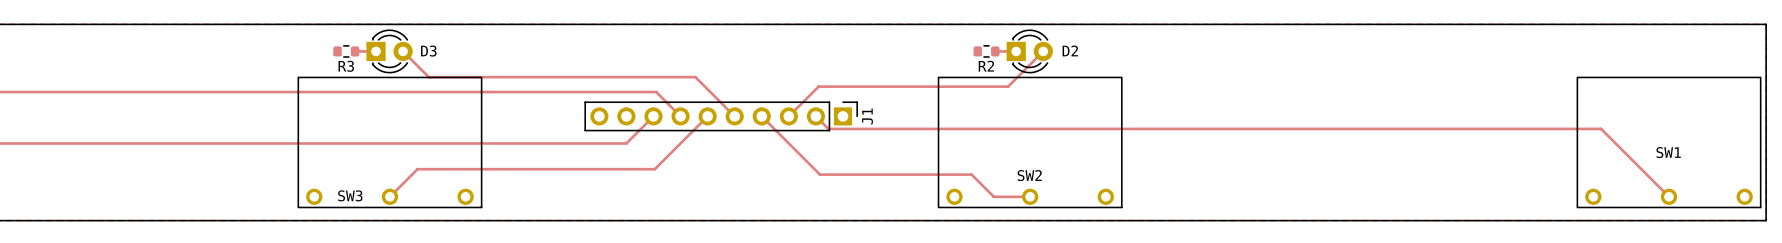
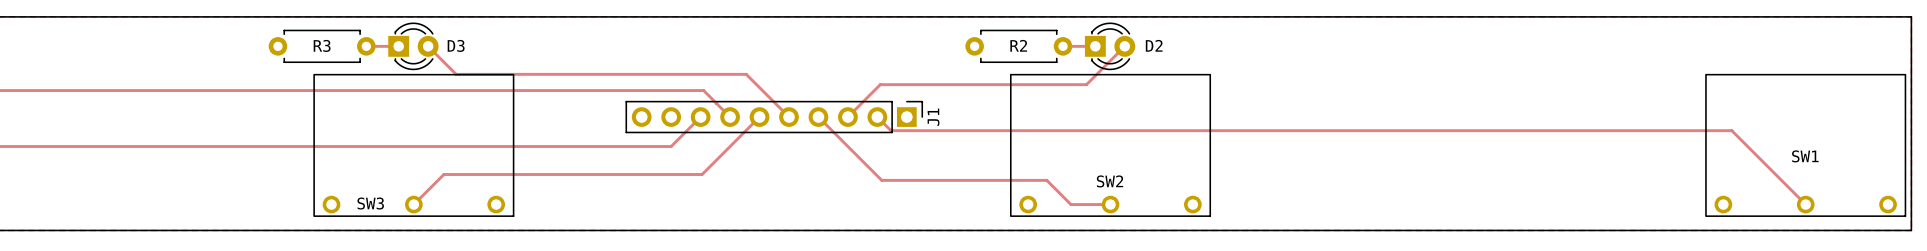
R3 footprint: [333, 45, 360, 58] -> [268, 29, 376, 63]
R2 footprint: [973, 45, 1000, 58] -> [965, 29, 1073, 63]

